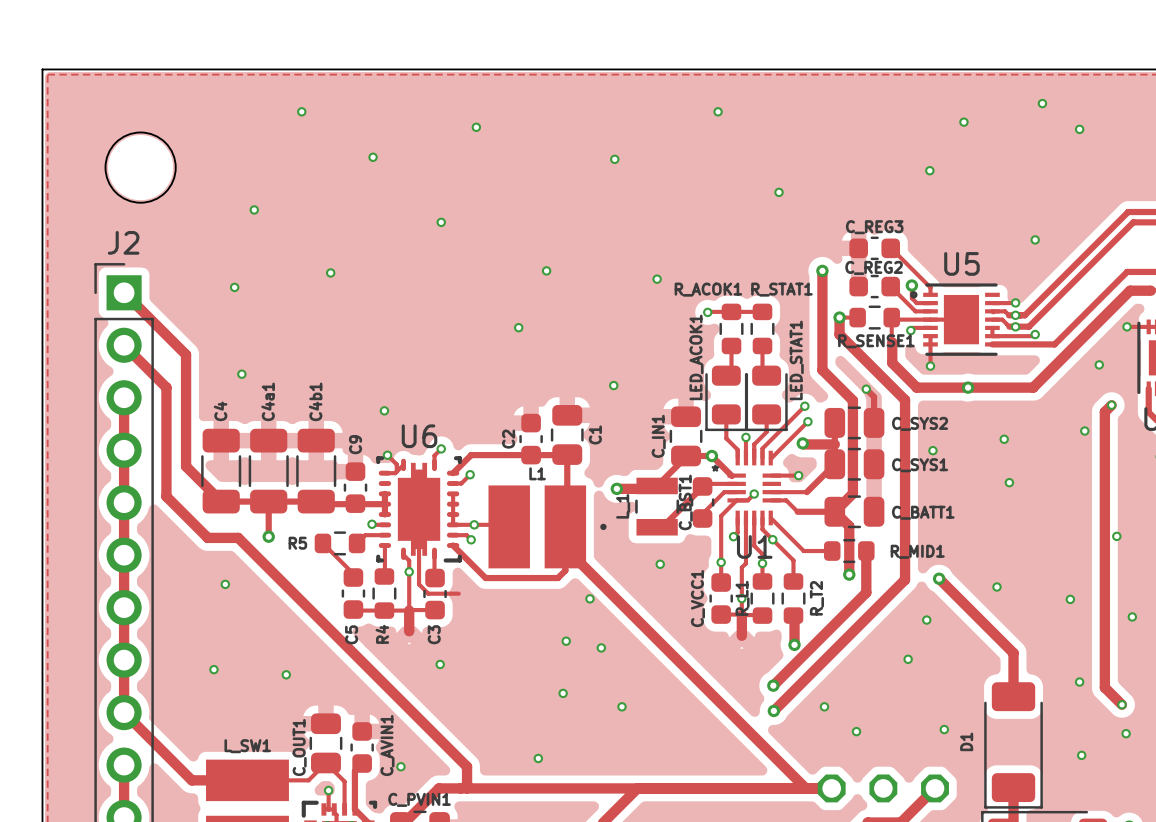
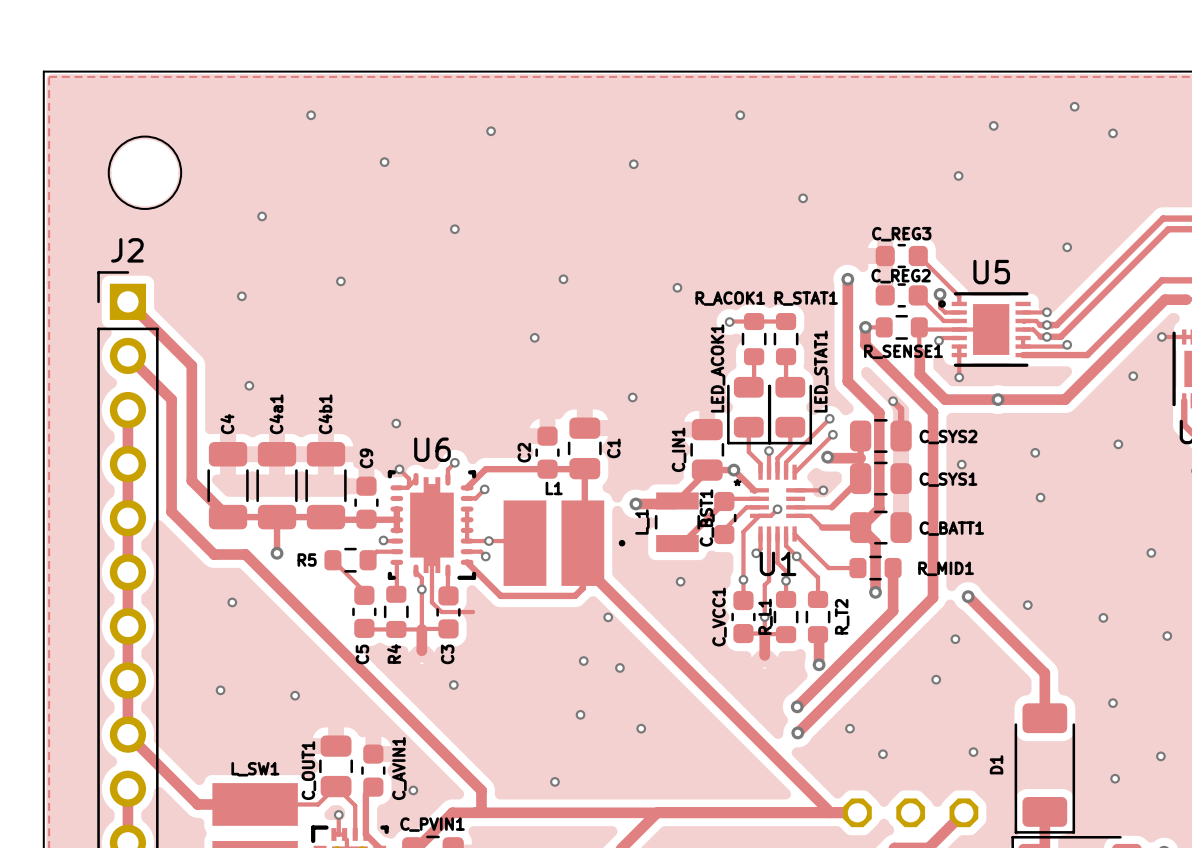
track: (1111, 405) (1104, 411) (1104, 687) (1121, 704) -> none
via: (1111, 405) -> none
via: (1121, 704) -> none

